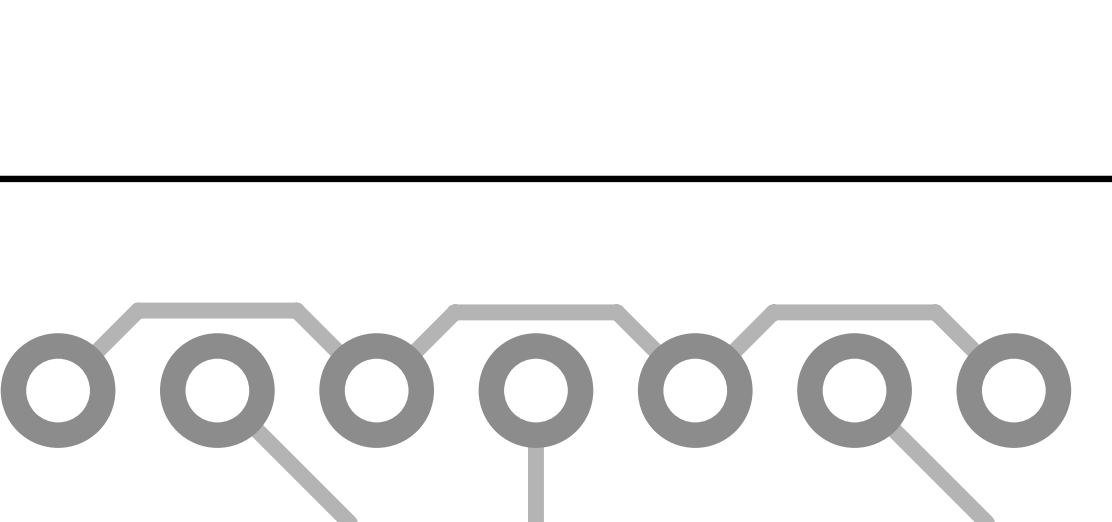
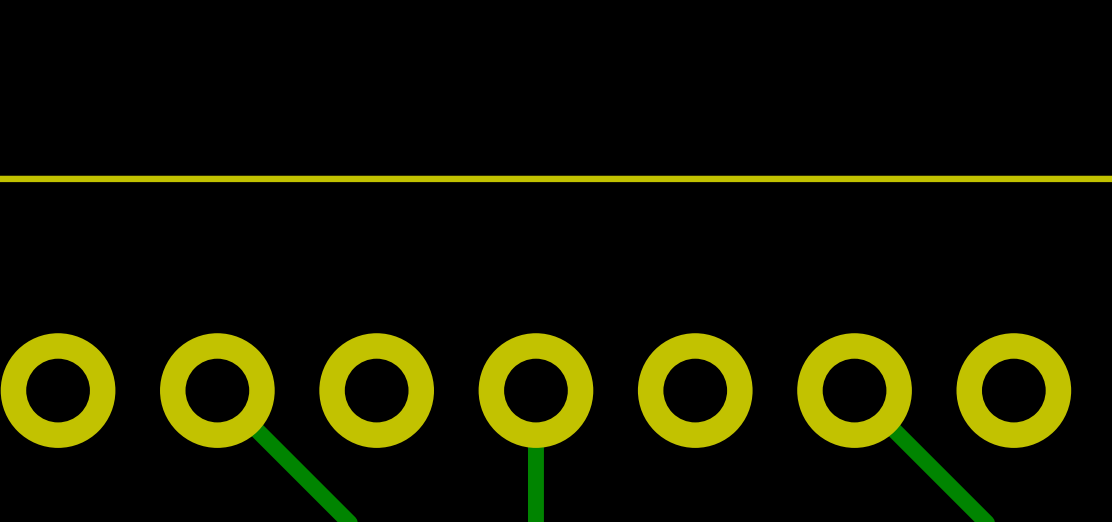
track: (1013, 390) (935, 312) (773, 312) (695, 390) (617, 312) (454, 312) (376, 390) (296, 310) (138, 310) (58, 390) -> none

